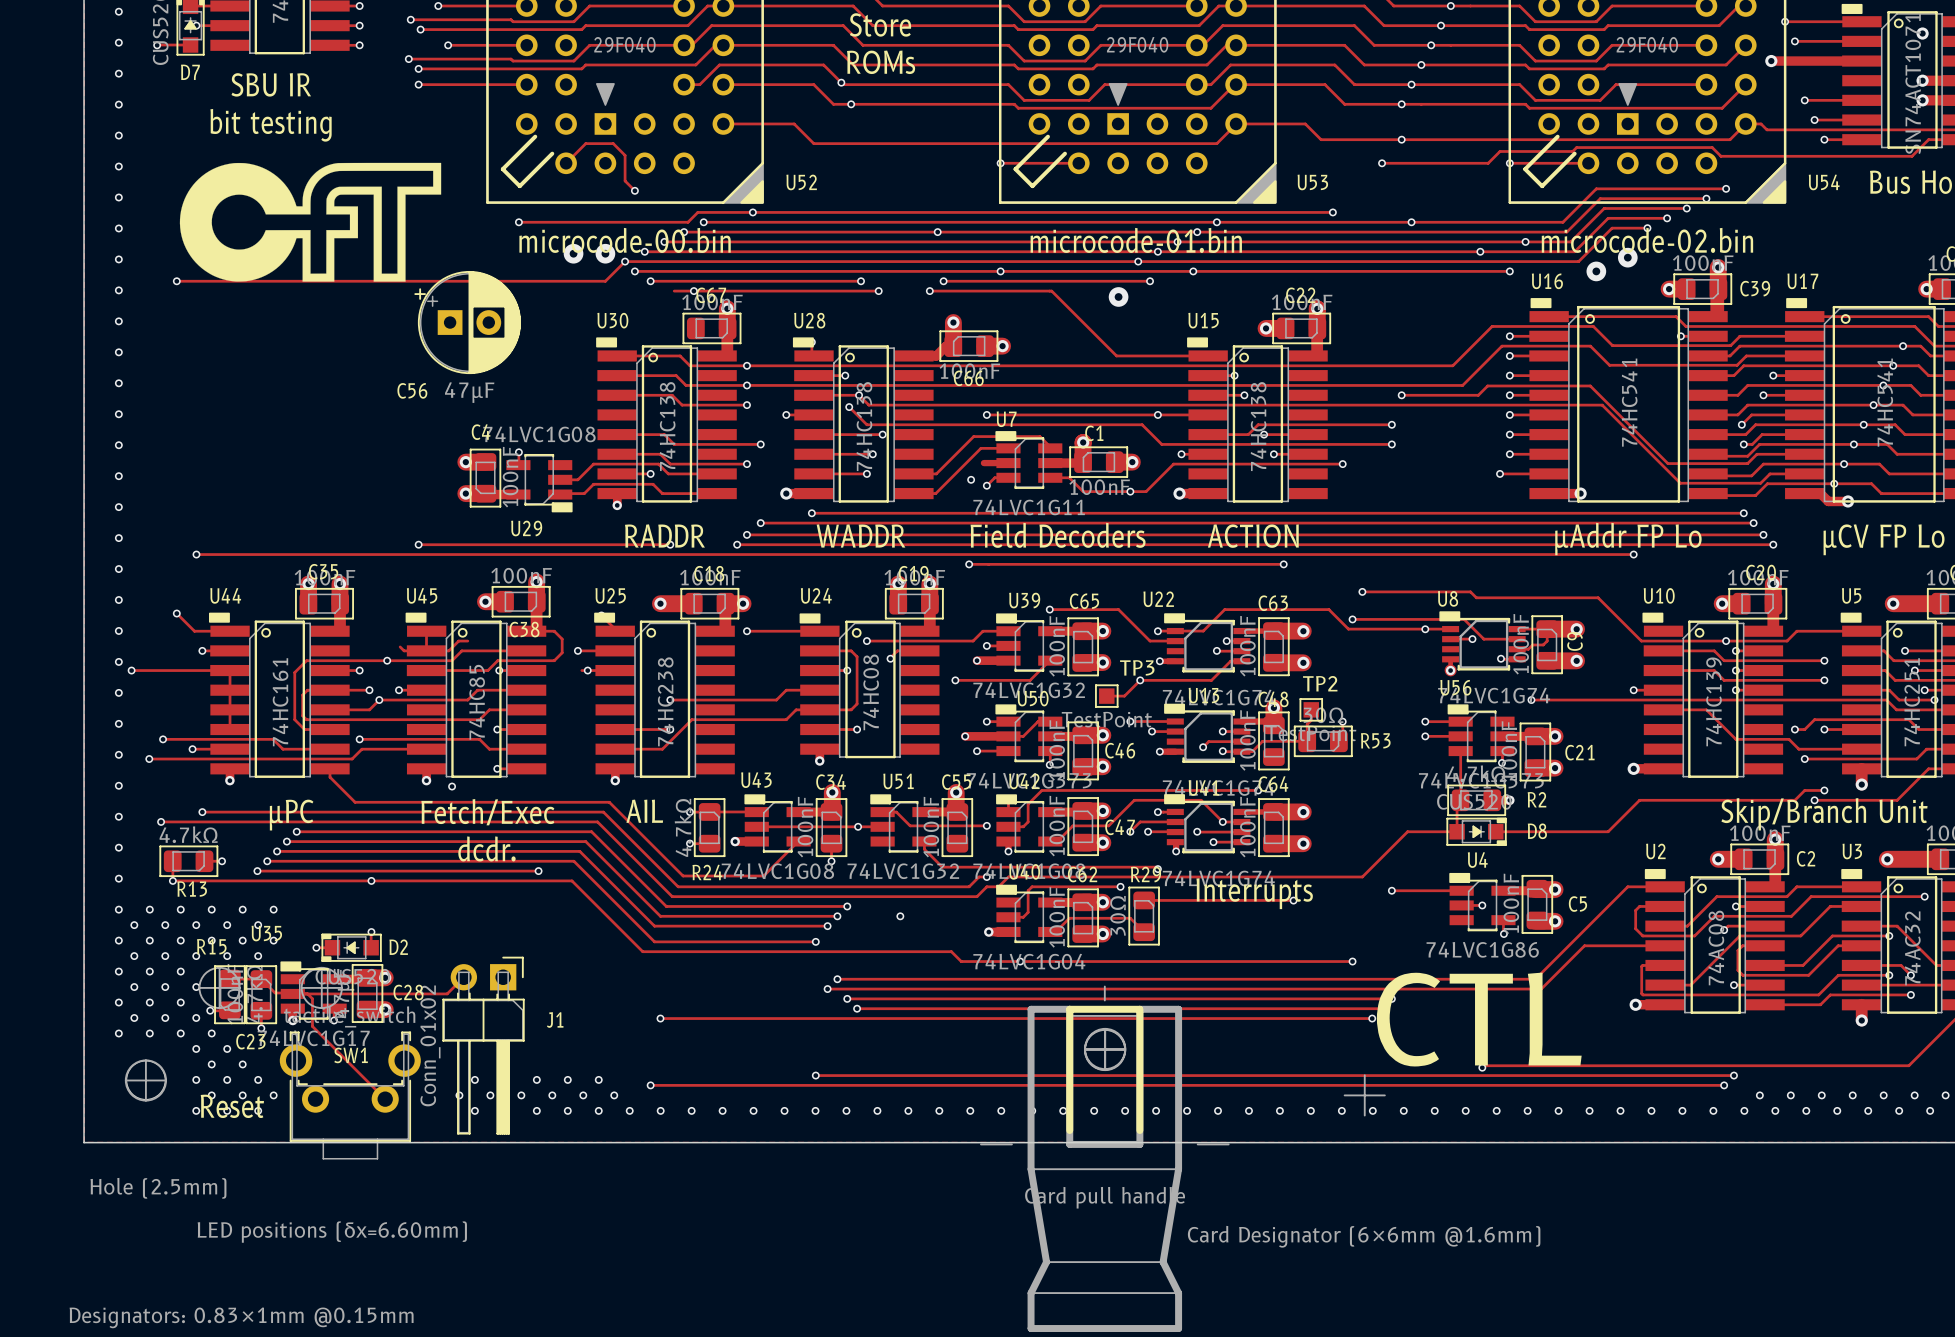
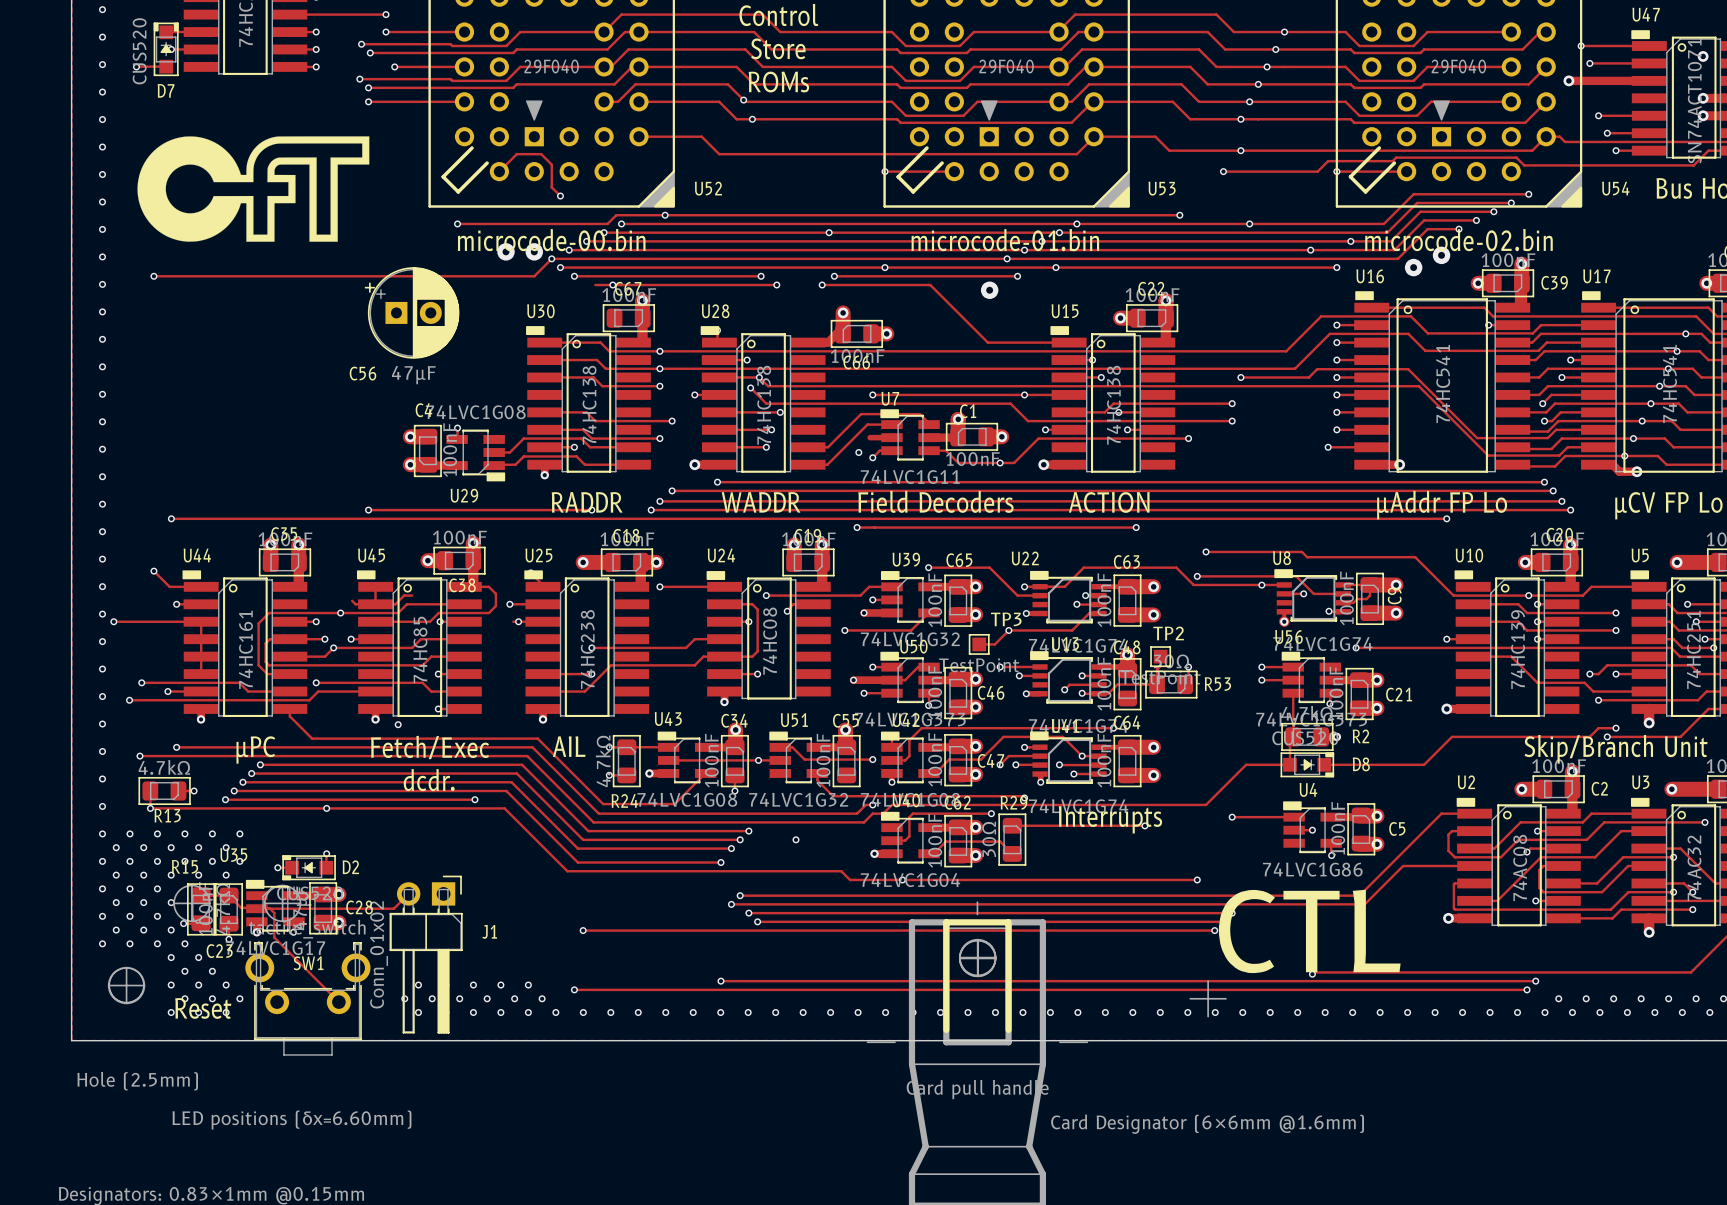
text: SBU IR (271, 84) -> none
text: bit testing (271, 125) -> none
drawing position: (310, 222) -> (253, 189)

